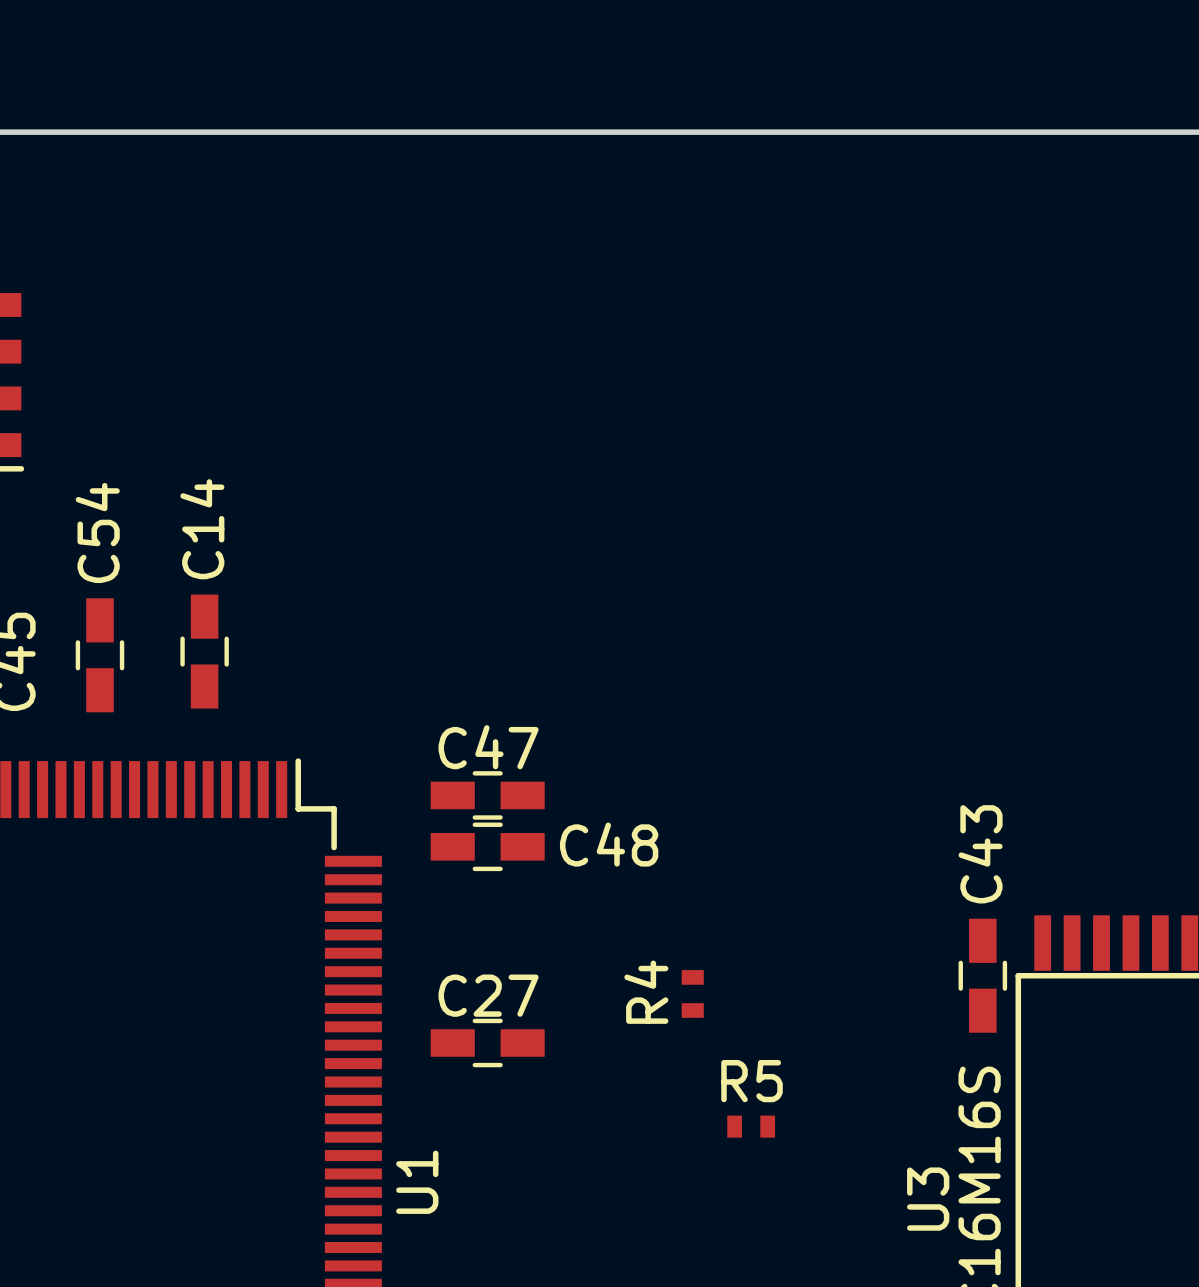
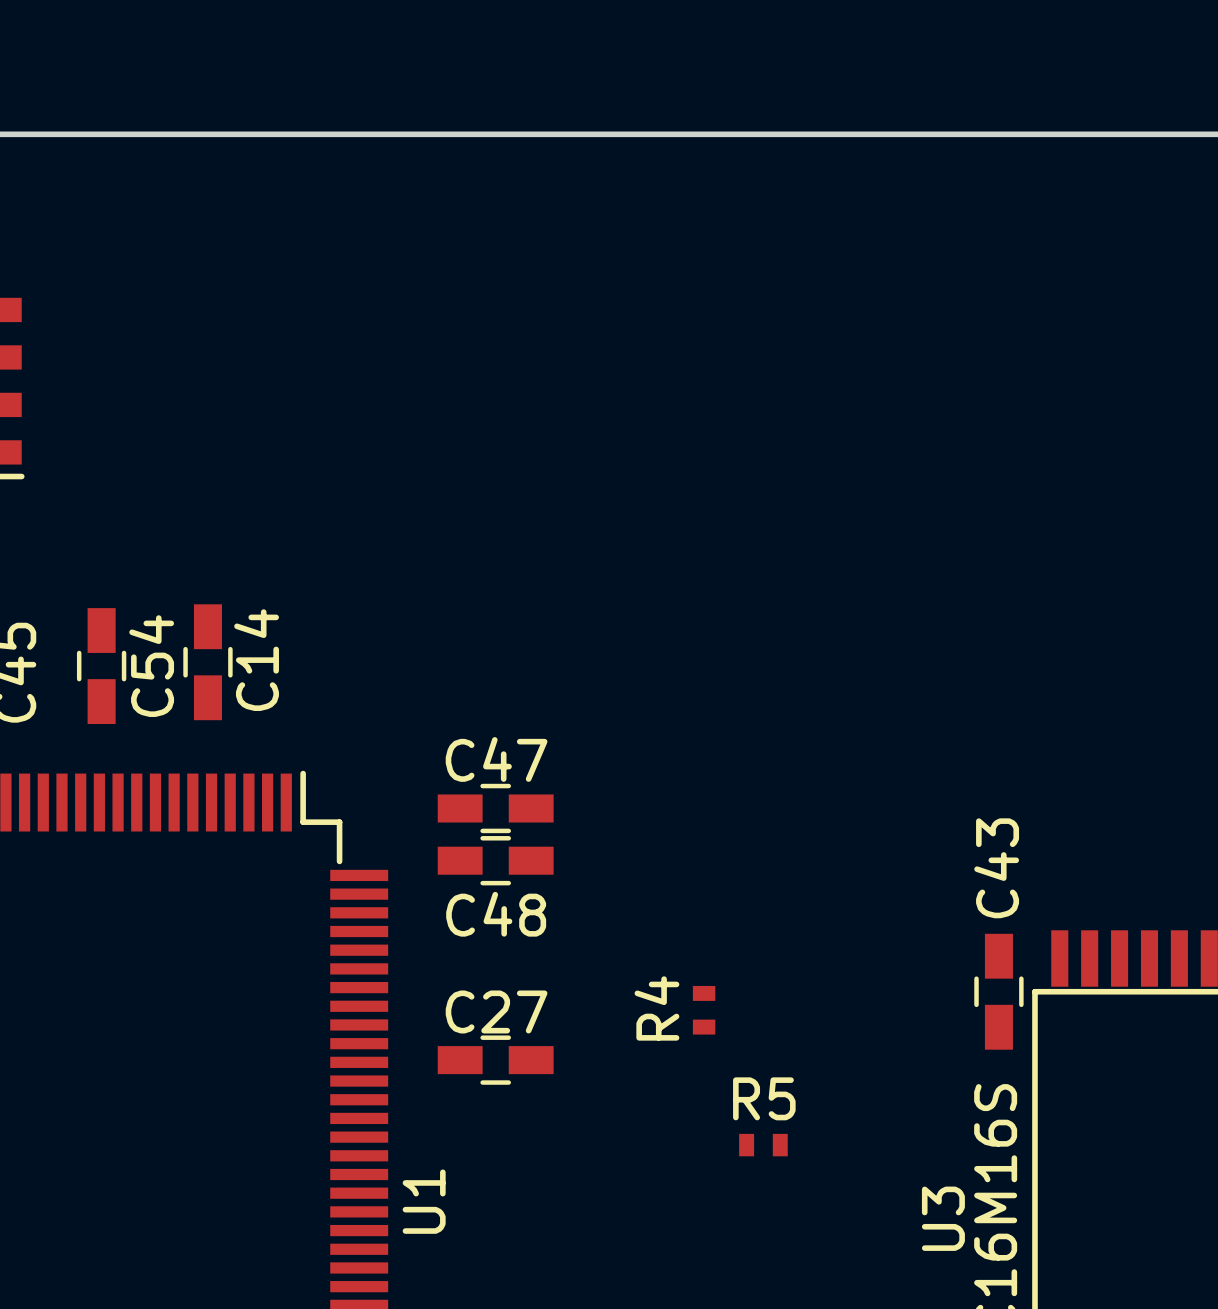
C14 name position: C14 (202, 529) -> C14 (256, 660)
C54 name position: C54 (97, 532) -> C54 (151, 666)
C48 name position: C48 (609, 844) -> C48 (496, 914)

